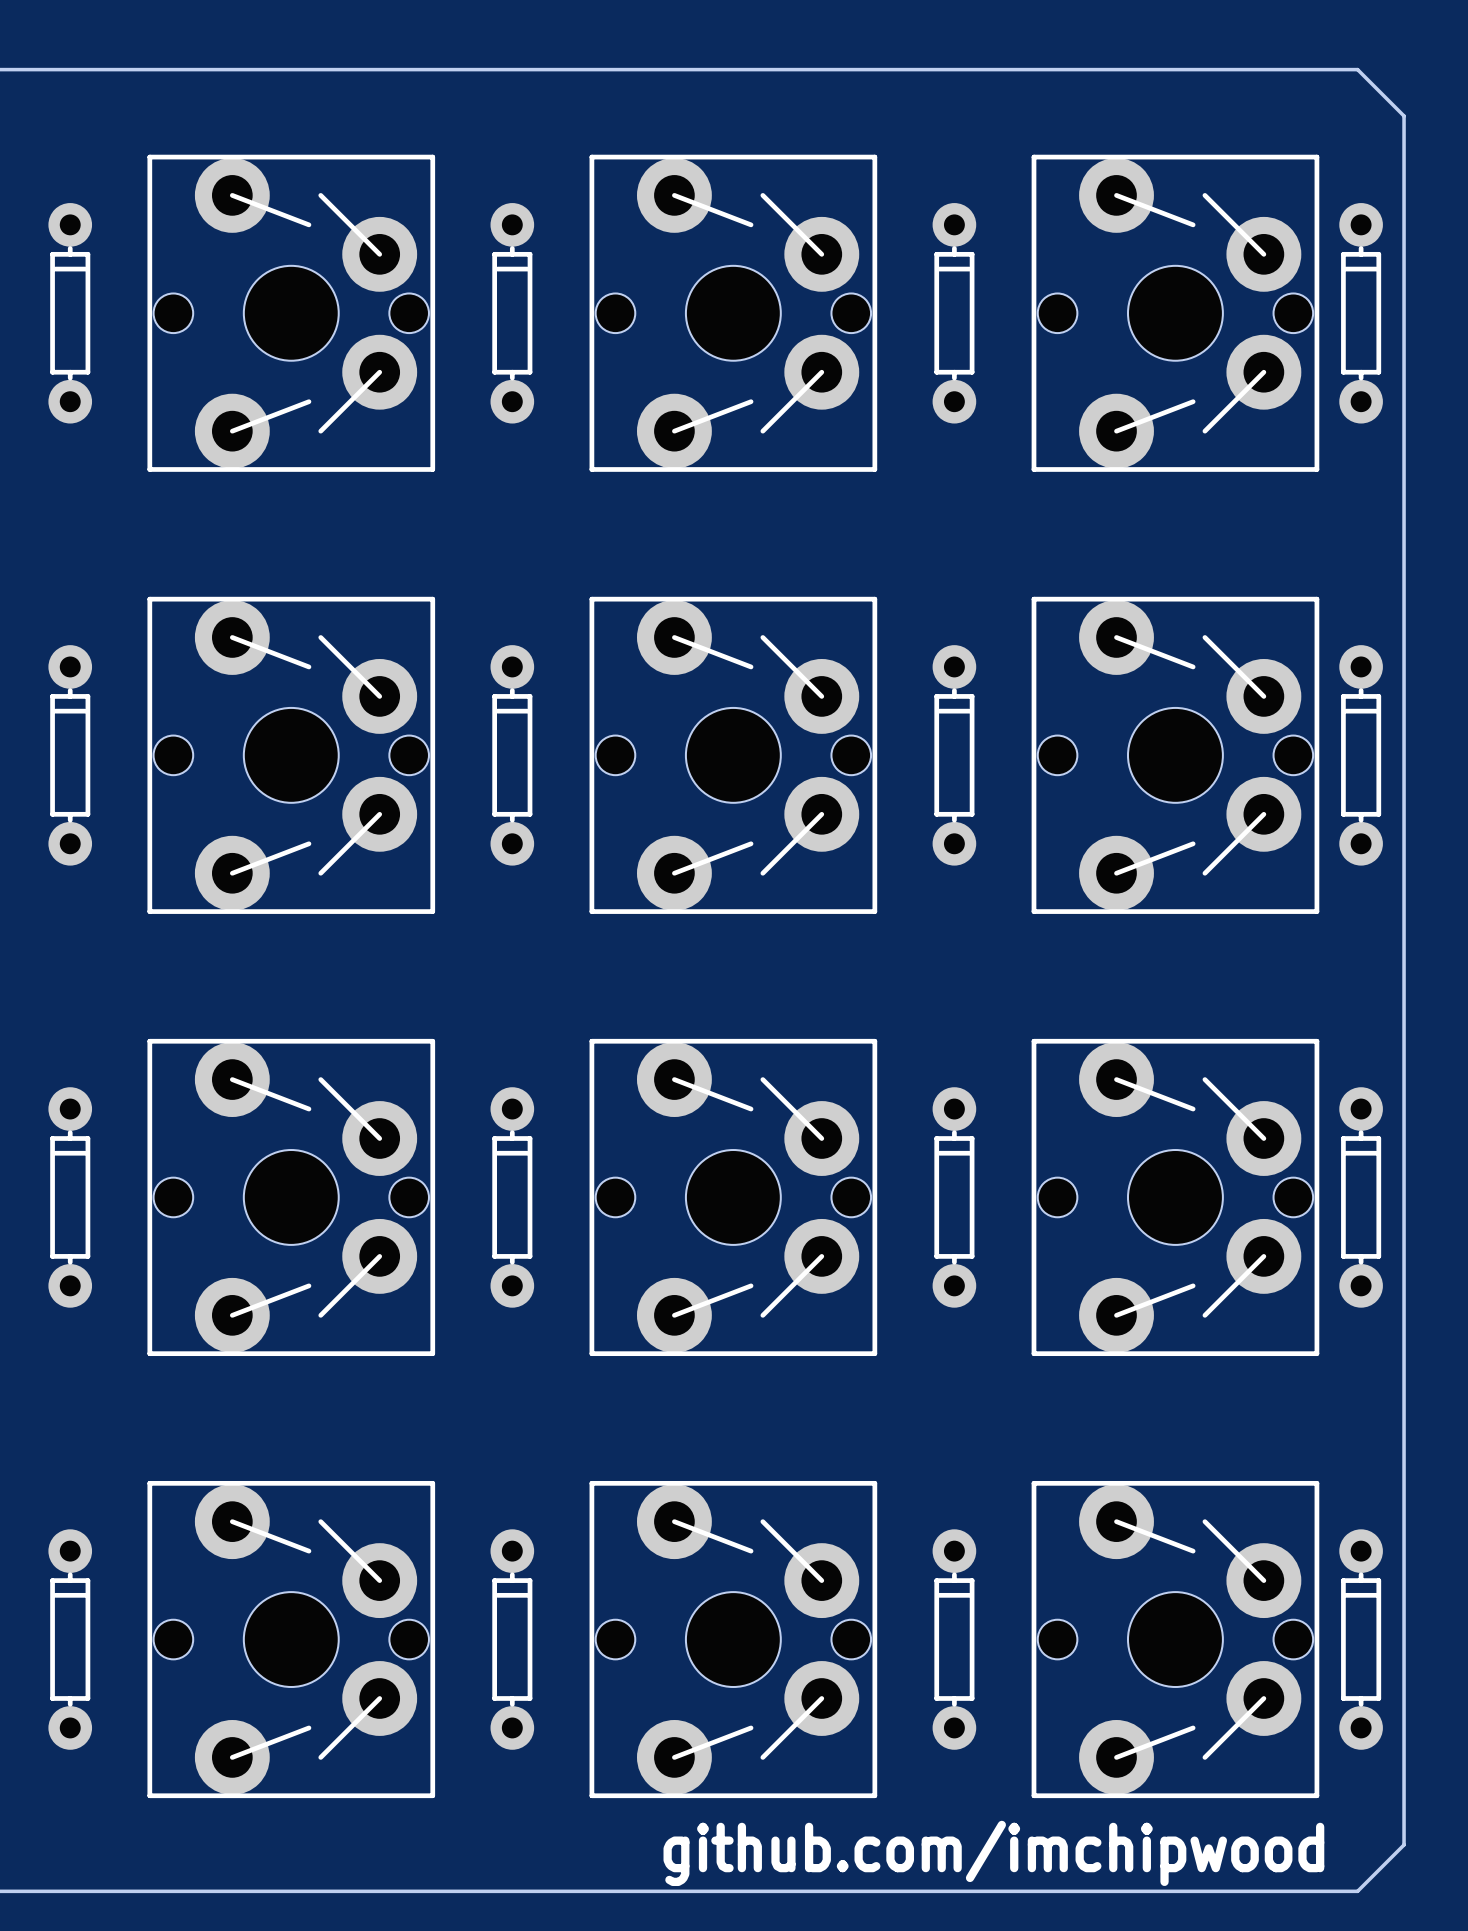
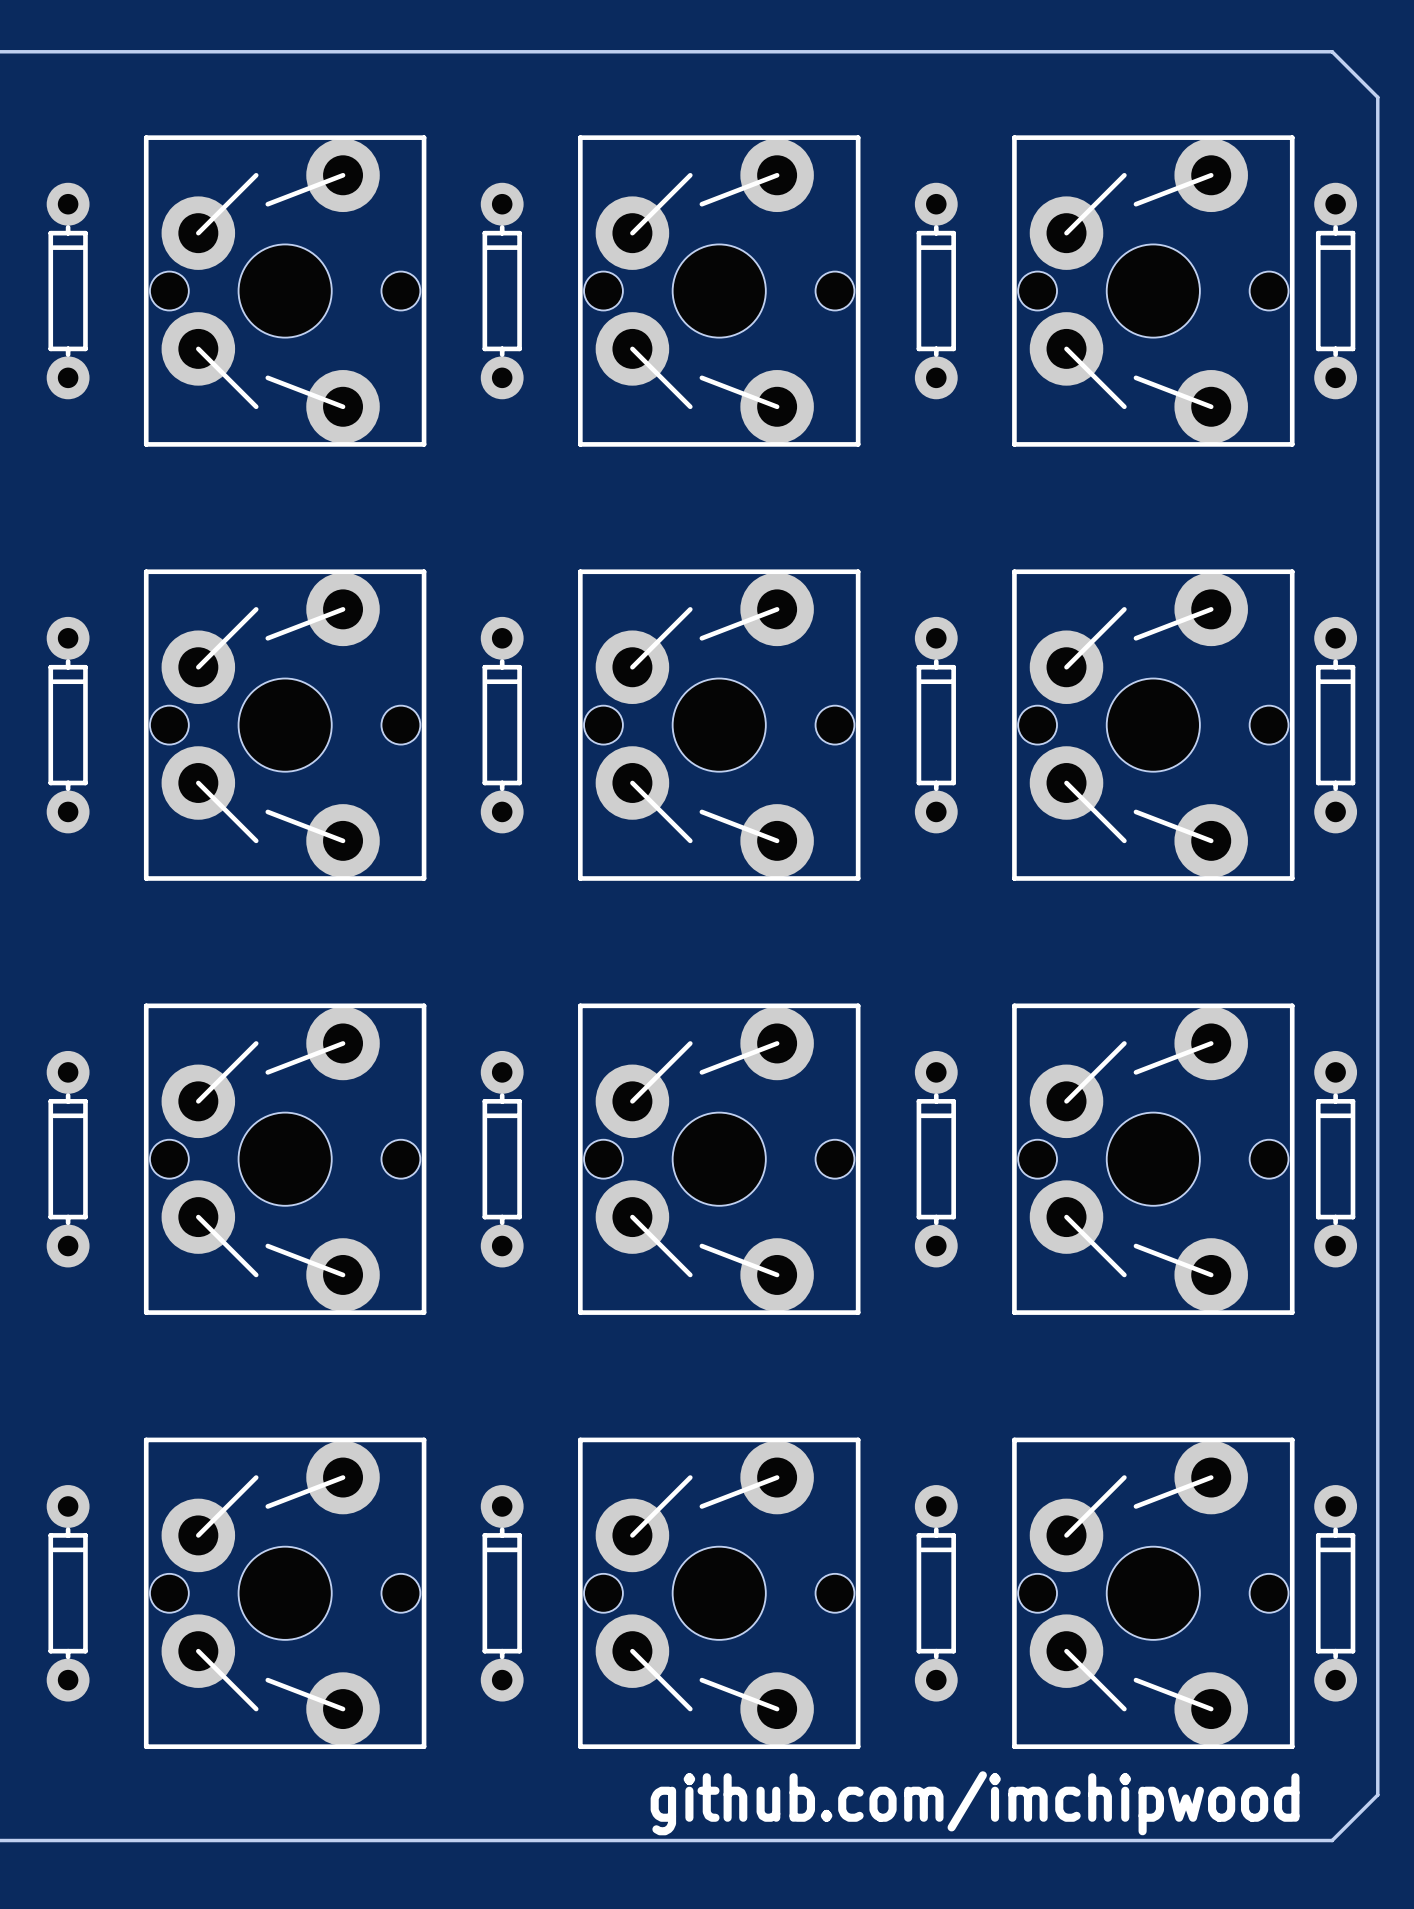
part rotation: 0° (291, 313) -> 180° (285, 291)
part rotation: 0° (733, 313) -> 180° (719, 291)
part rotation: 0° (1175, 313) -> 180° (1153, 291)
part rotation: 0° (291, 755) -> 180° (285, 725)
part rotation: 0° (733, 755) -> 180° (719, 725)
part rotation: 0° (1175, 755) -> 180° (1153, 725)
part rotation: 0° (291, 1197) -> 180° (285, 1159)
part rotation: 0° (733, 1197) -> 180° (719, 1159)
part rotation: 0° (1175, 1197) -> 180° (1153, 1159)
part rotation: 0° (291, 1639) -> 180° (285, 1593)
part rotation: 0° (733, 1639) -> 180° (719, 1593)
part rotation: 0° (1175, 1639) -> 180° (1153, 1593)

